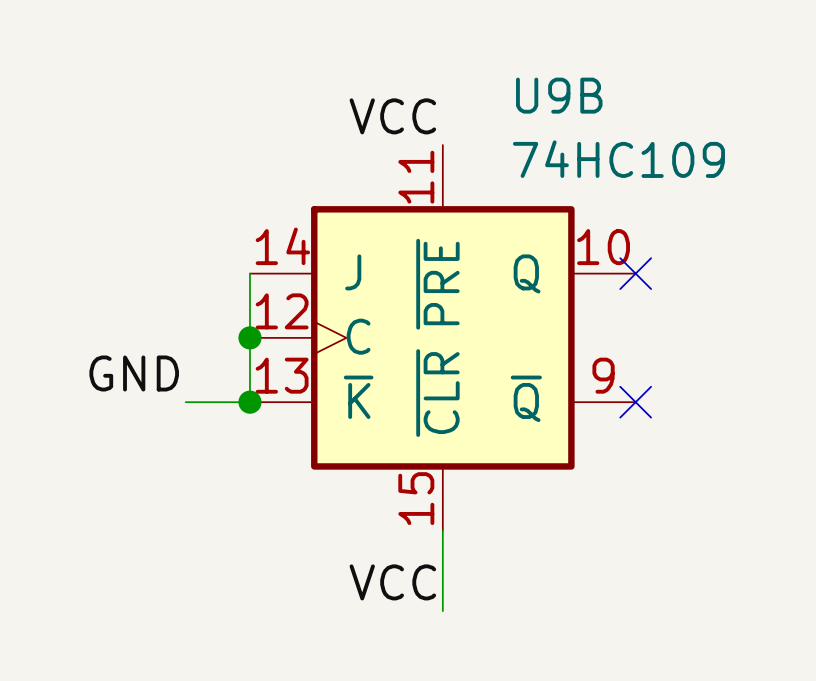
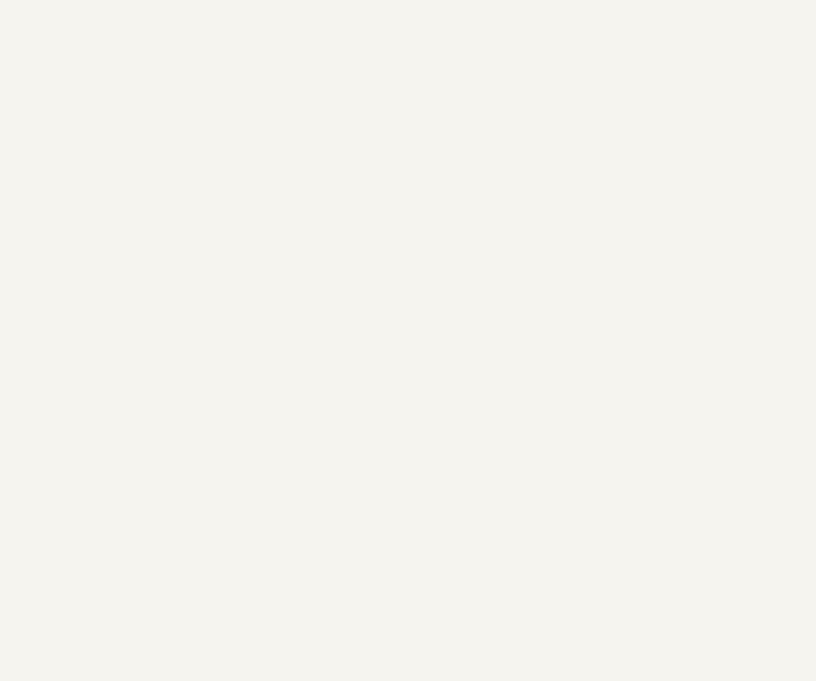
label: VCC (392, 116) -> none
wire: (249, 273) (249, 402) (185, 402) -> none
no-connect mark: (635, 273) -> none
junction: (249, 337) -> none
U9B: 74HC109 (442, 337) -> none
label: GND (134, 373) -> none
junction: (249, 402) -> none
no-connect mark: (635, 402) -> none
wire: (442, 530) (442, 611) -> none
label: VCC (392, 582) -> none

